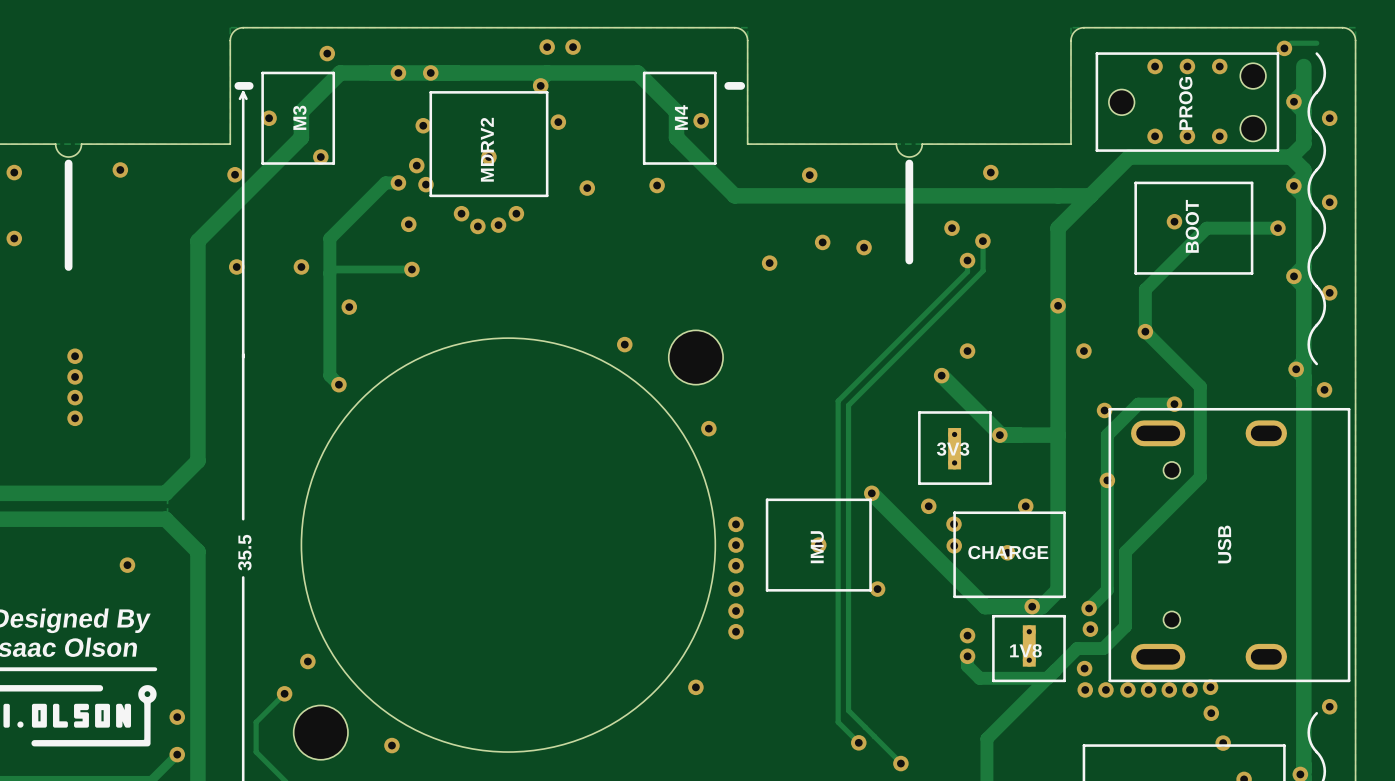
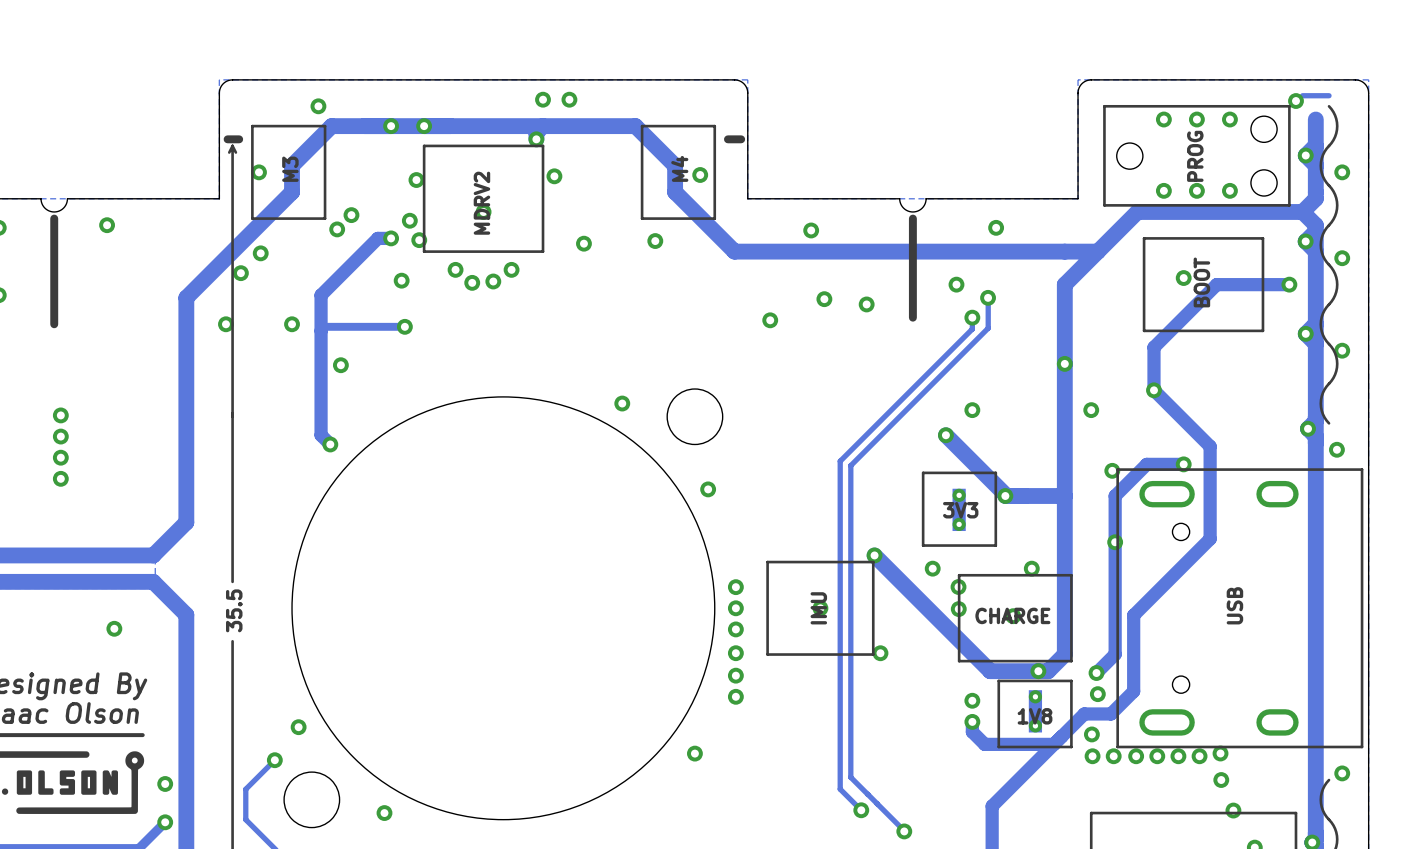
via: (320, 157) -> none
via: none -> (351, 215)
via: (235, 174) -> none
via: none -> (337, 229)
via: none -> (260, 253)
via: none -> (240, 273)

